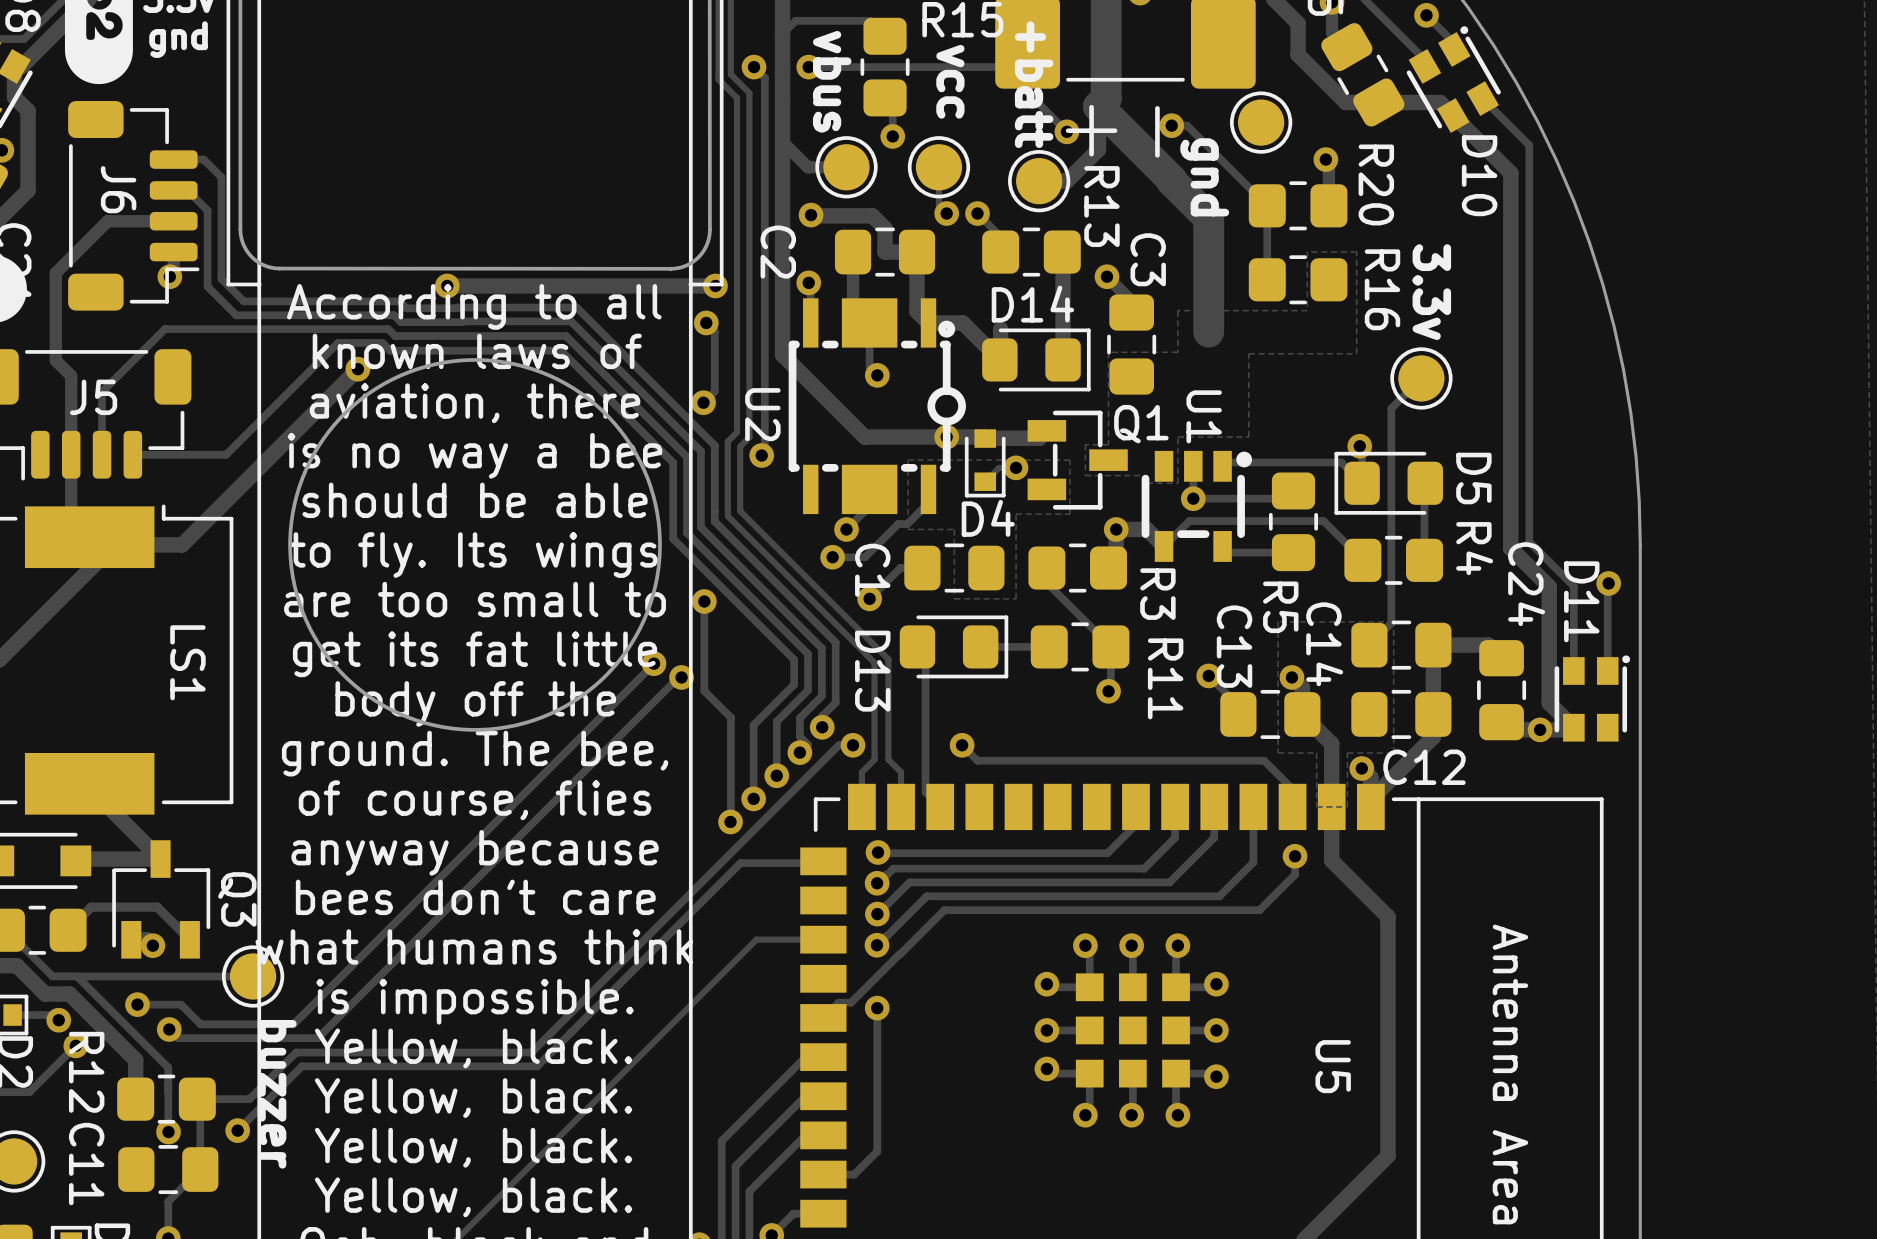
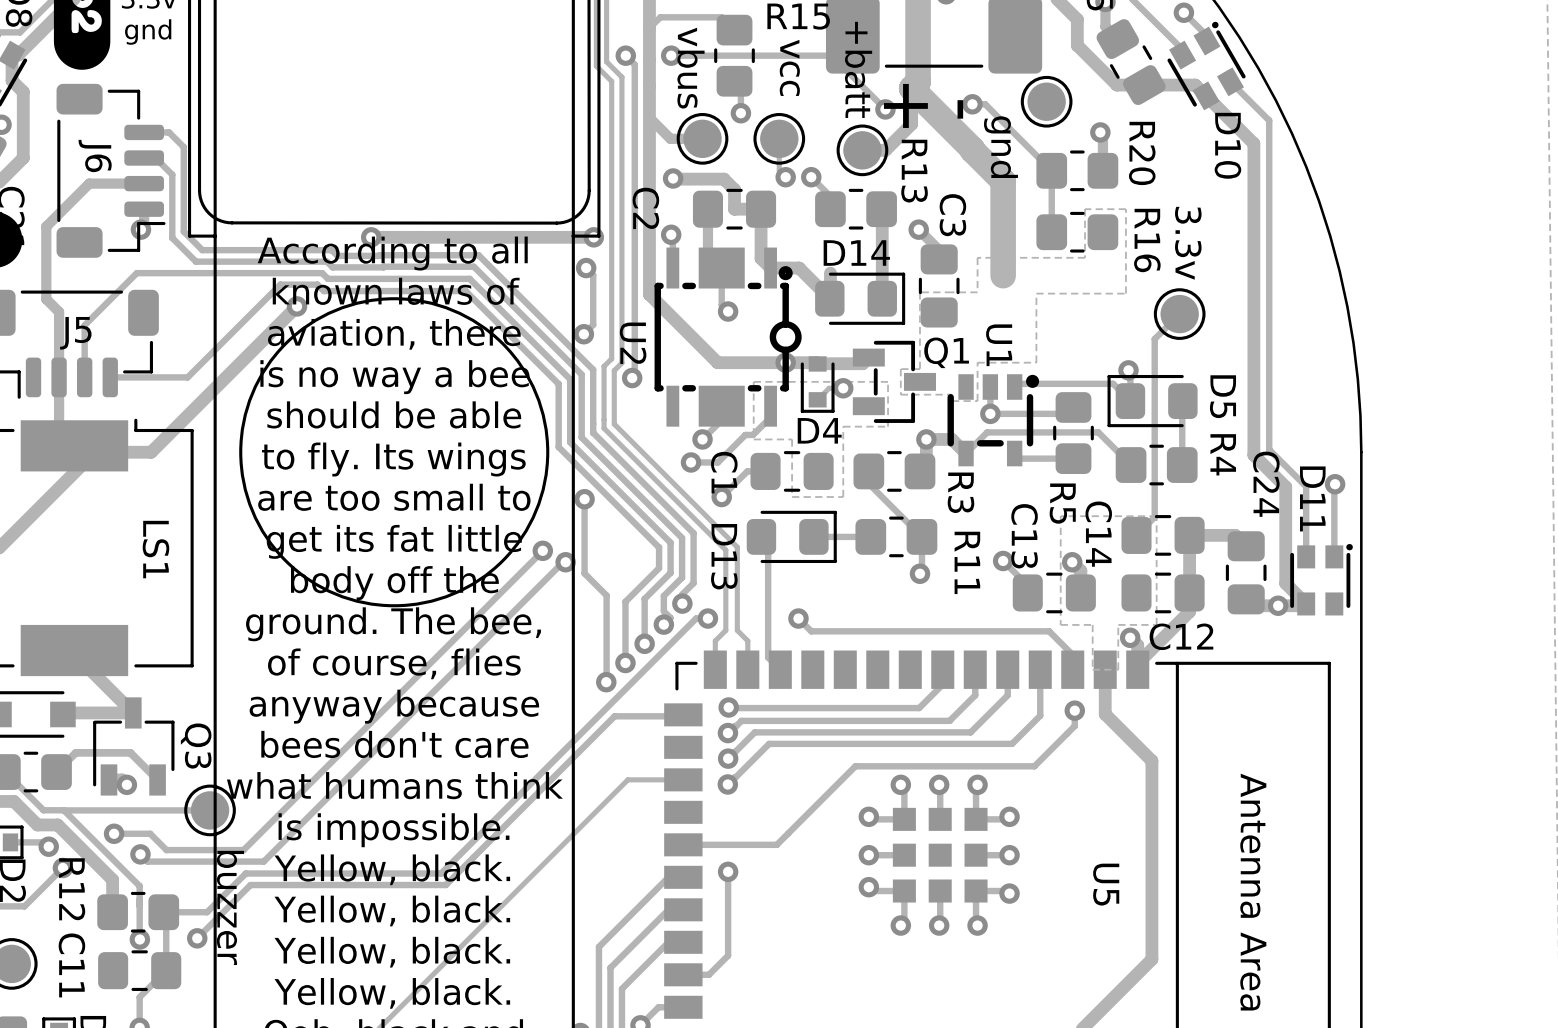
track: (1302, 714) (1331, 743) (1331, 806) -> none
track: (1259, 910) (944, 910) (851, 1002) (838, 1002) (823, 1017) -> (1045, 755) (1034, 766) (855, 766) (776, 844) (683, 844)
track: (877, 1008) (877, 1050) -> none
via position: (877, 1008) -> (728, 871)

